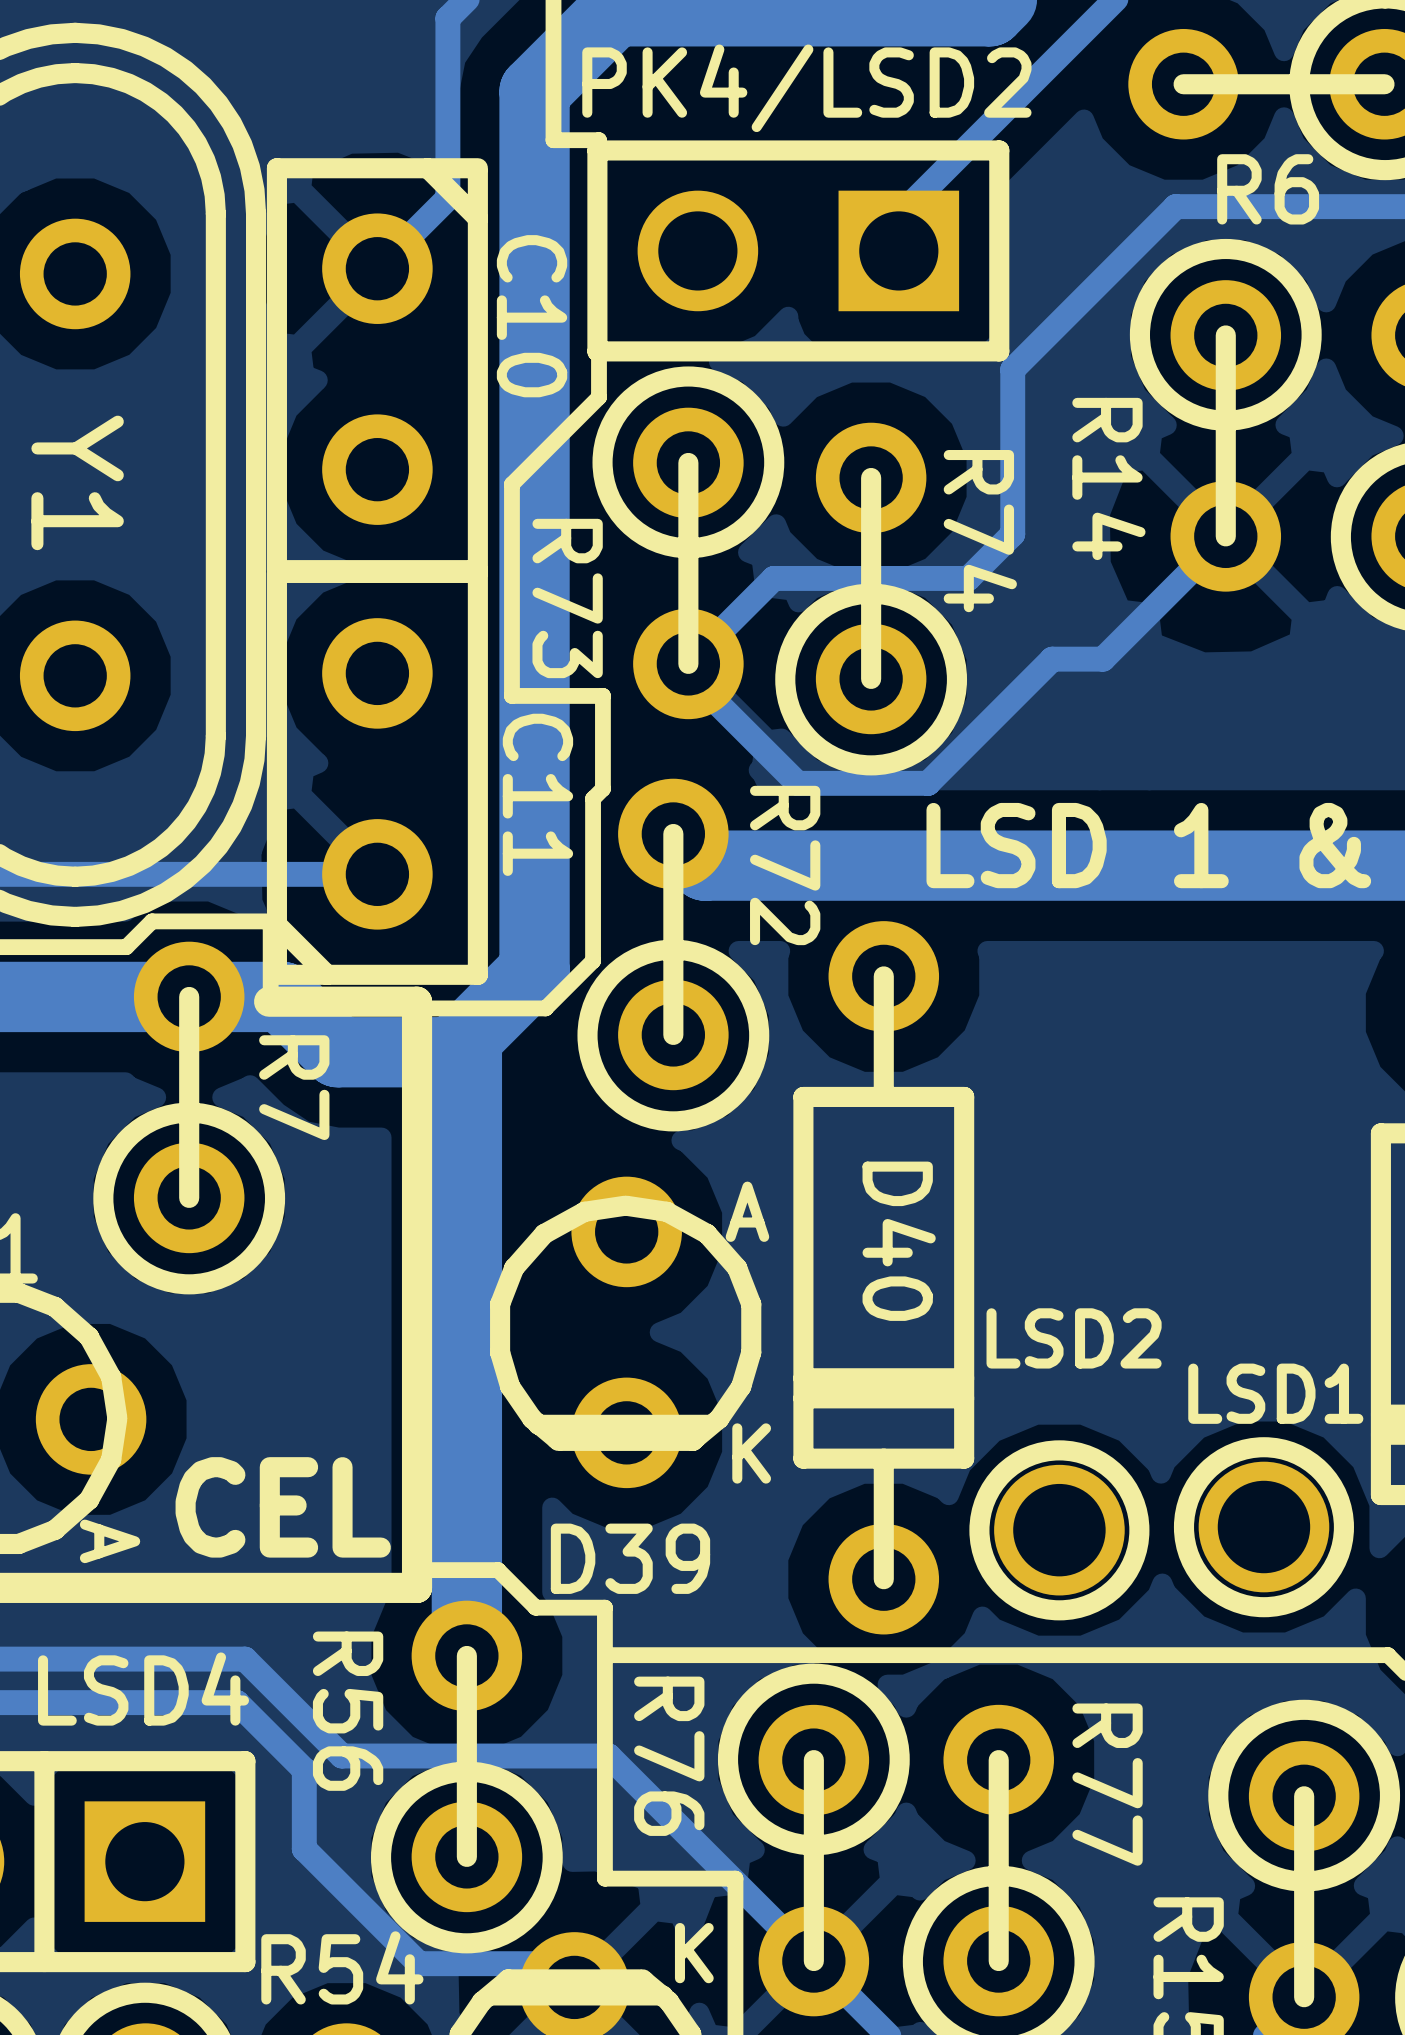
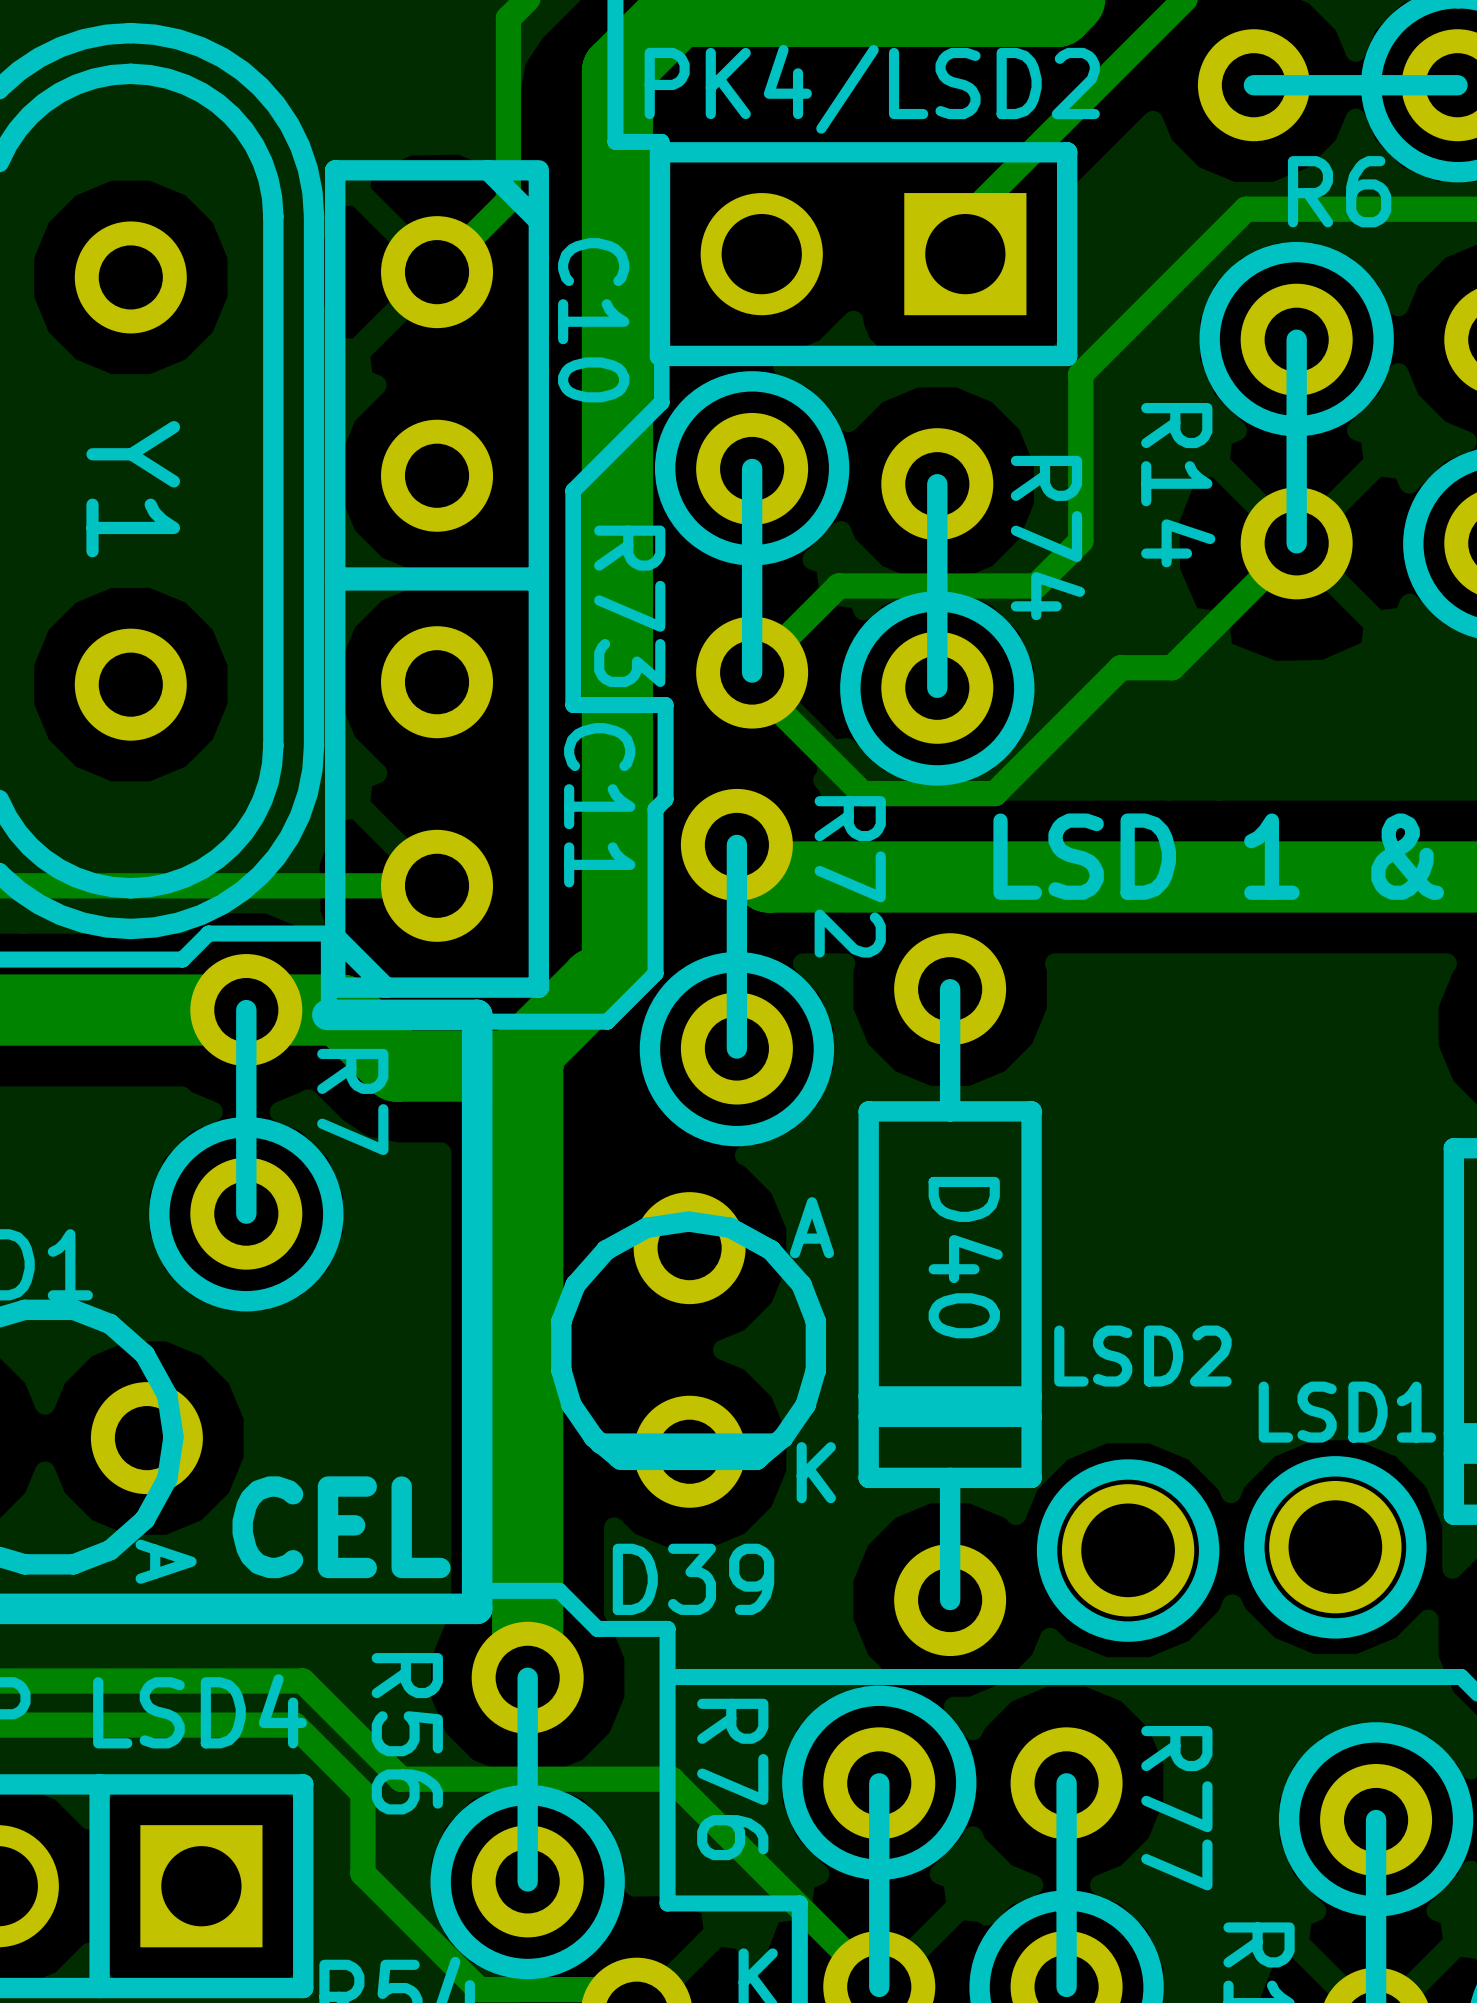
track: (555, 70) (534, 91) (534, 970) -> (617, 71) (617, 965) (599, 983) (596, 983)

